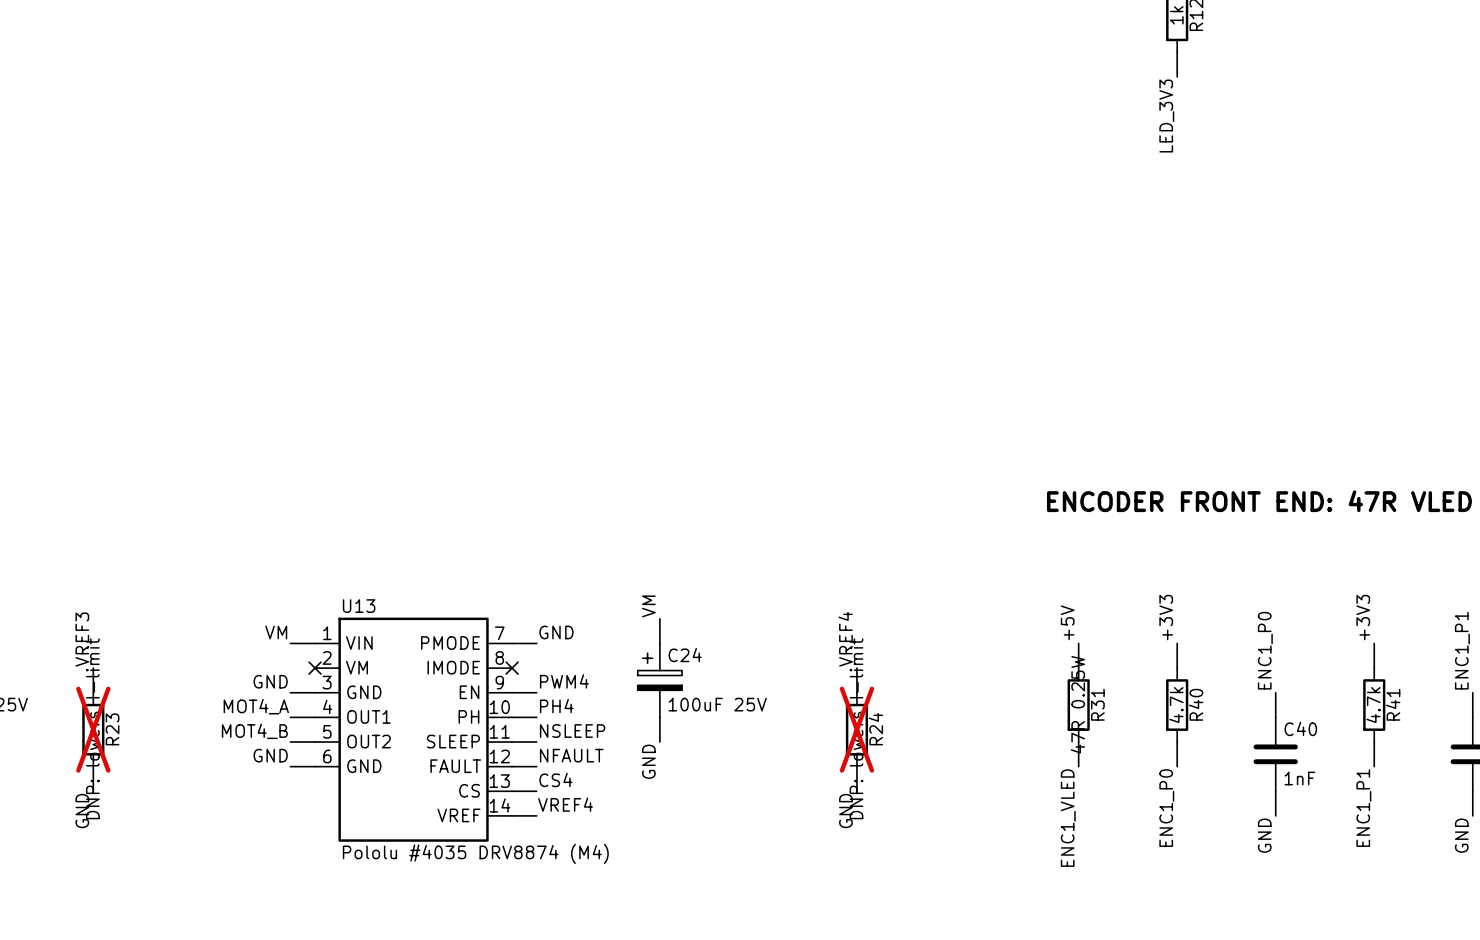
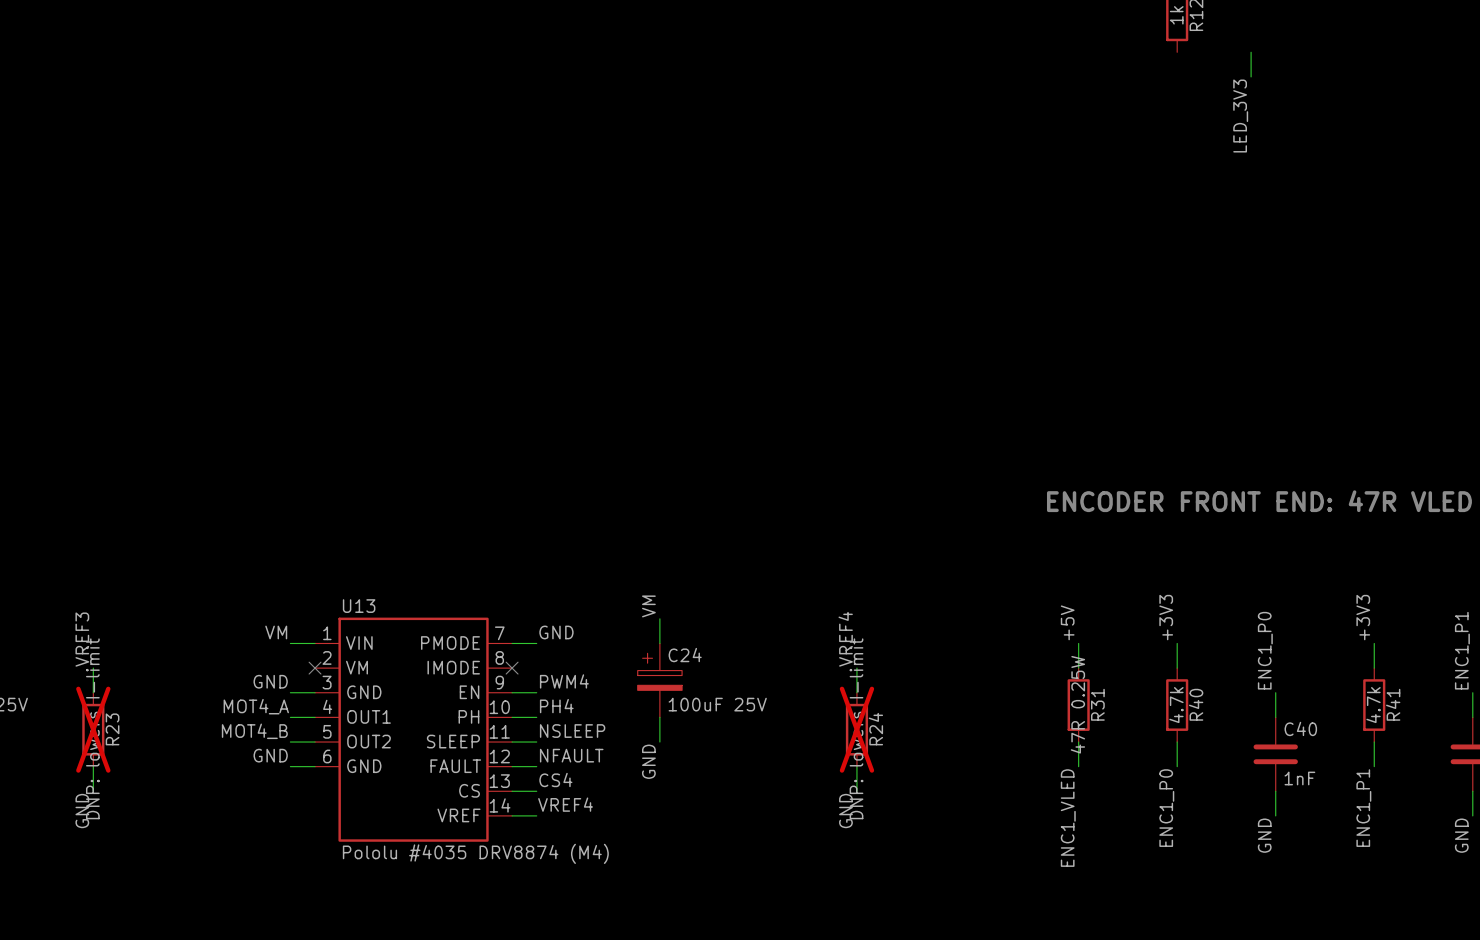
wire: (1177, 52) (1177, 76) -> (1251, 52) (1251, 76)
label position: LED_3V3 (1166, 116) -> LED_3V3 (1240, 116)

